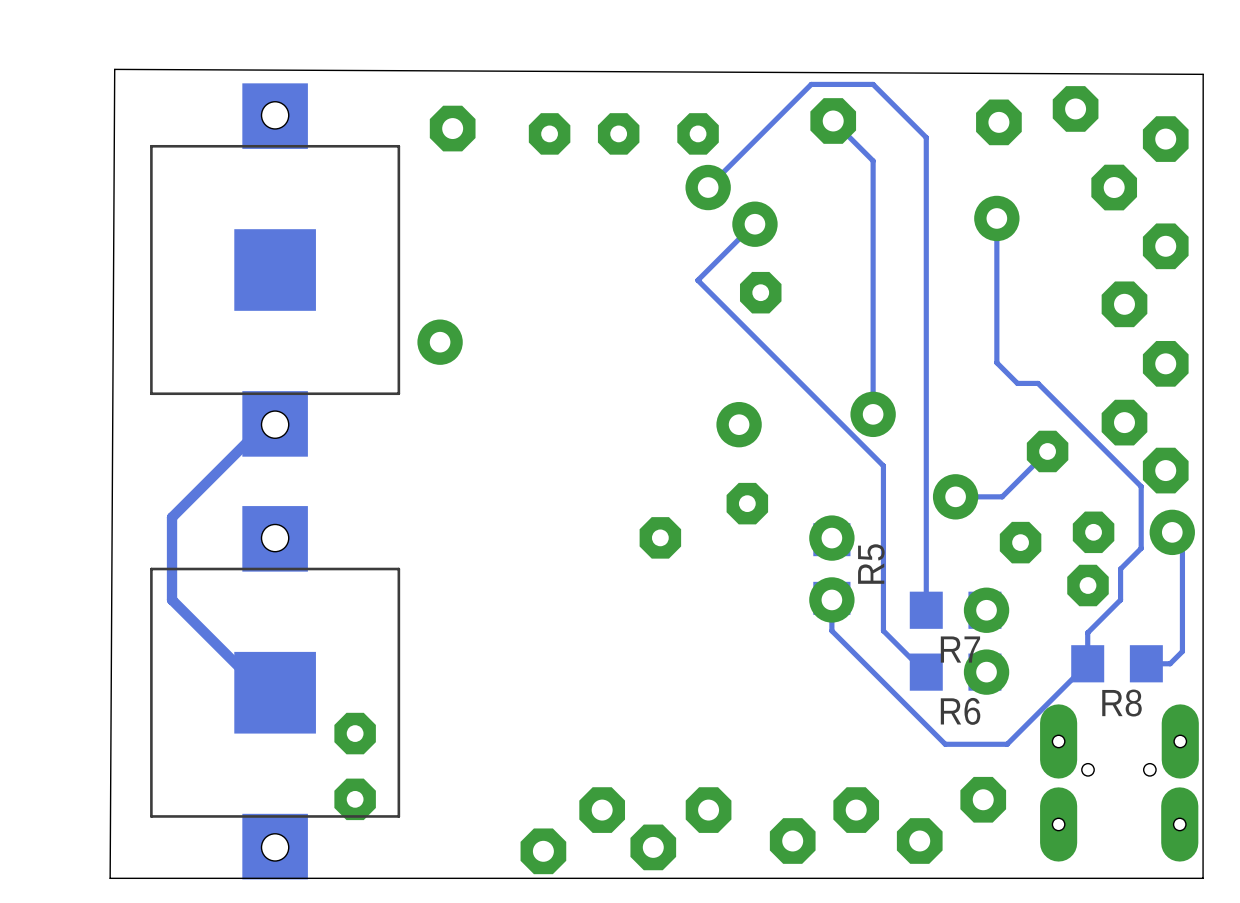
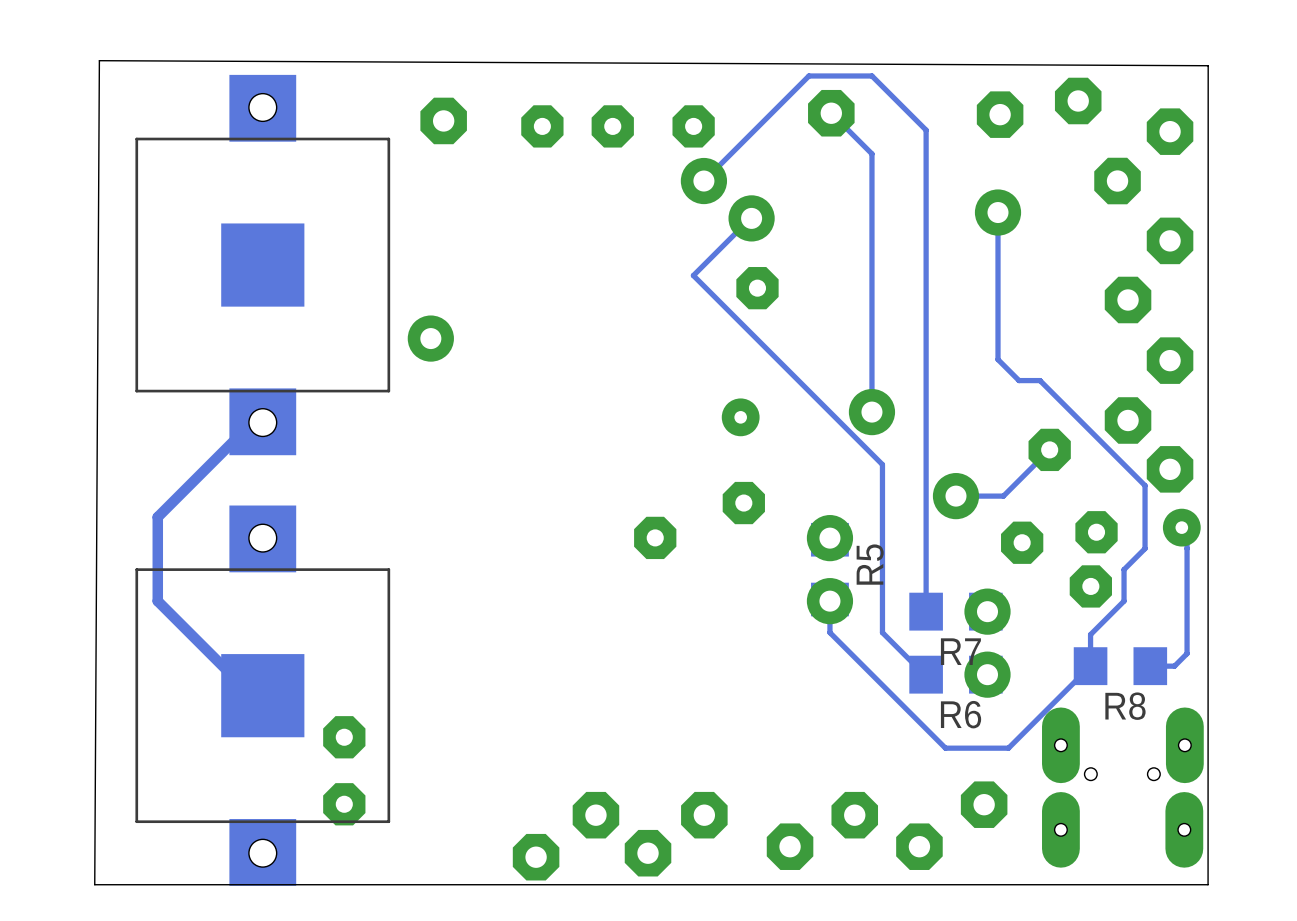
via size: [716, 401, 762, 448] -> [721, 398, 760, 437]
via size: [1149, 509, 1195, 556] -> [1162, 508, 1201, 547]

